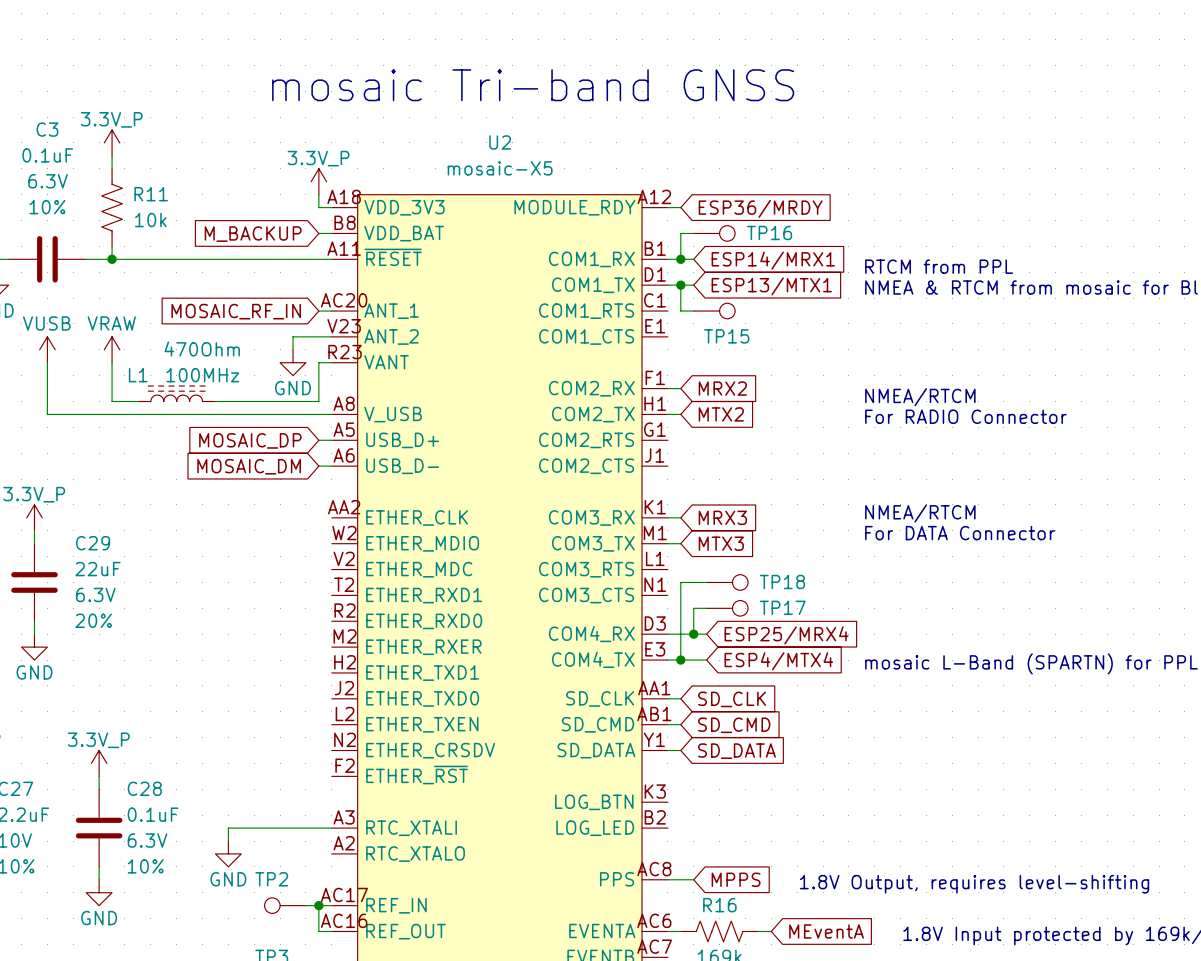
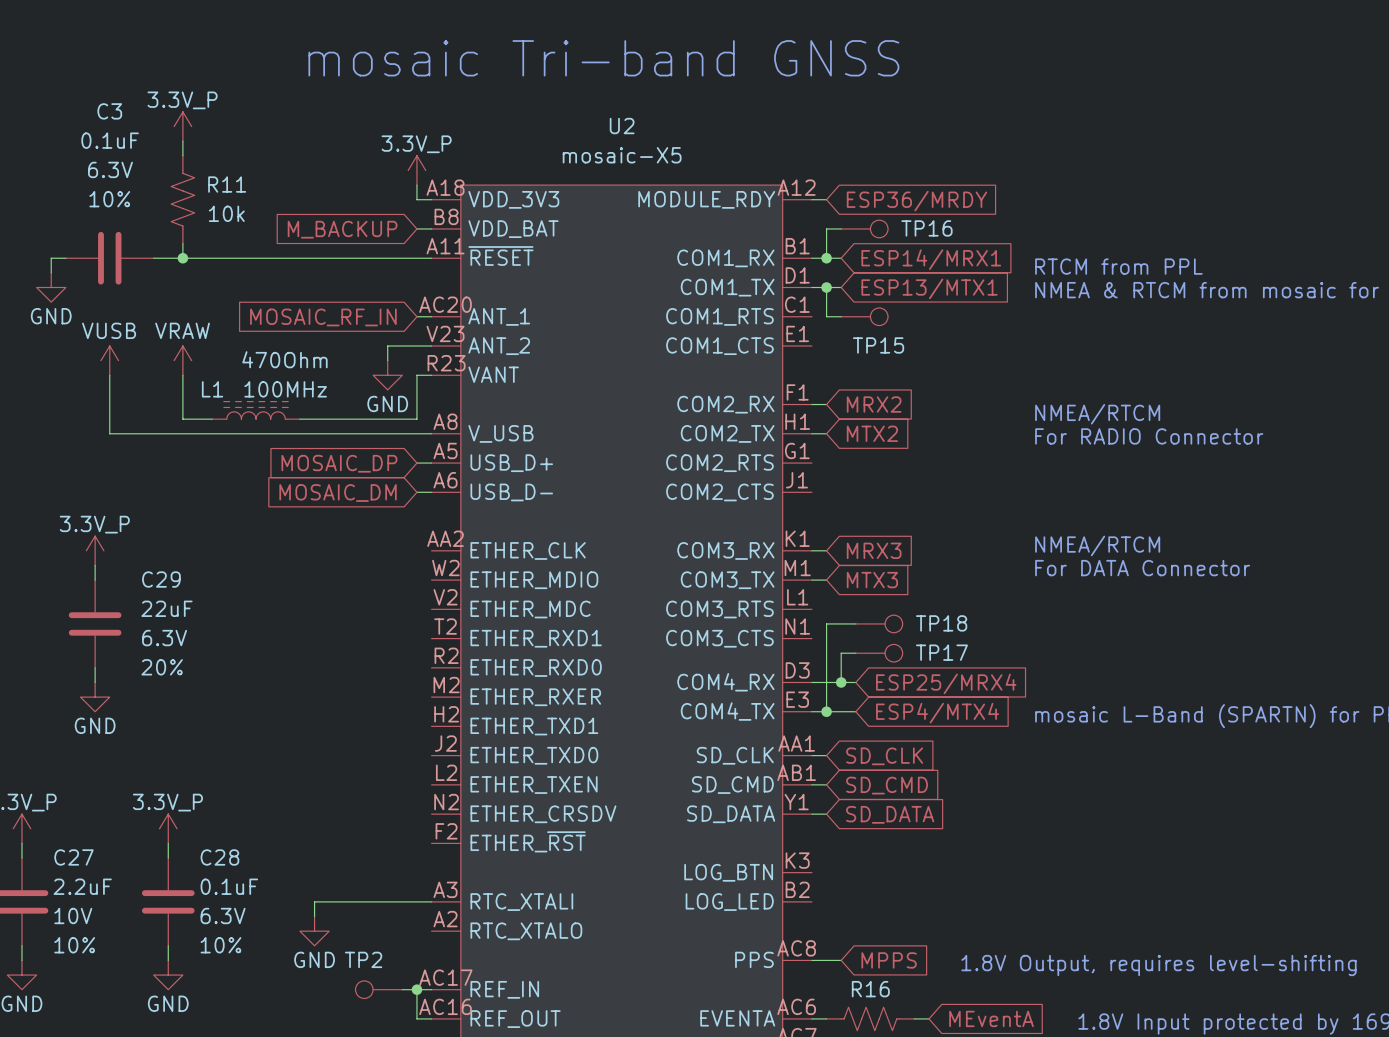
text position: mosaic Tri-band GNSS (533, 85) -> mosaic Tri-band GNSS (603, 58)

